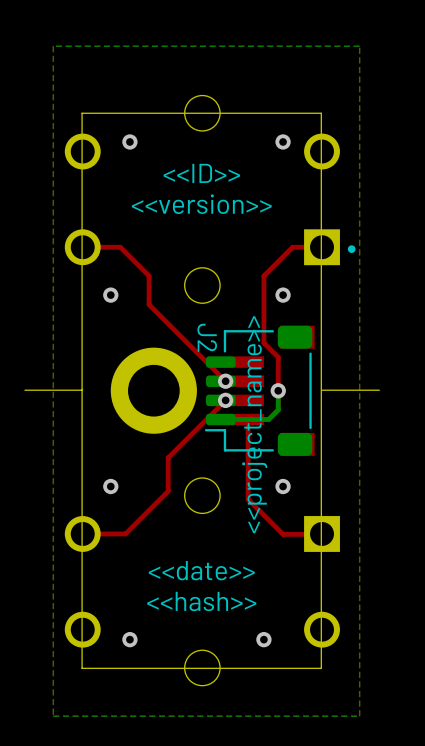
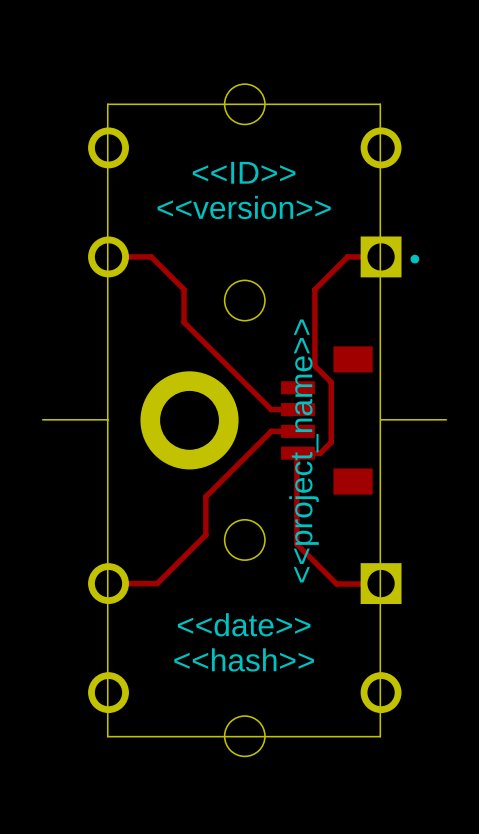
bottom zone outline: (359, 46) (53, 46) (53, 716) (359, 716) (359, 46) -> none
via: (129, 141) -> none
via: (283, 141) -> none
via: (110, 295) -> none
via: (283, 295) -> none
via: (225, 381) -> none
J2: (258, 390) -> none
bottom track: (278, 390) (278, 409) (268, 419) (220, 419) -> none
via: (278, 390) -> none
via: (225, 400) -> none
via: (110, 486) -> none
via: (283, 486) -> none
via: (129, 639) -> none
via: (263, 639) -> none

